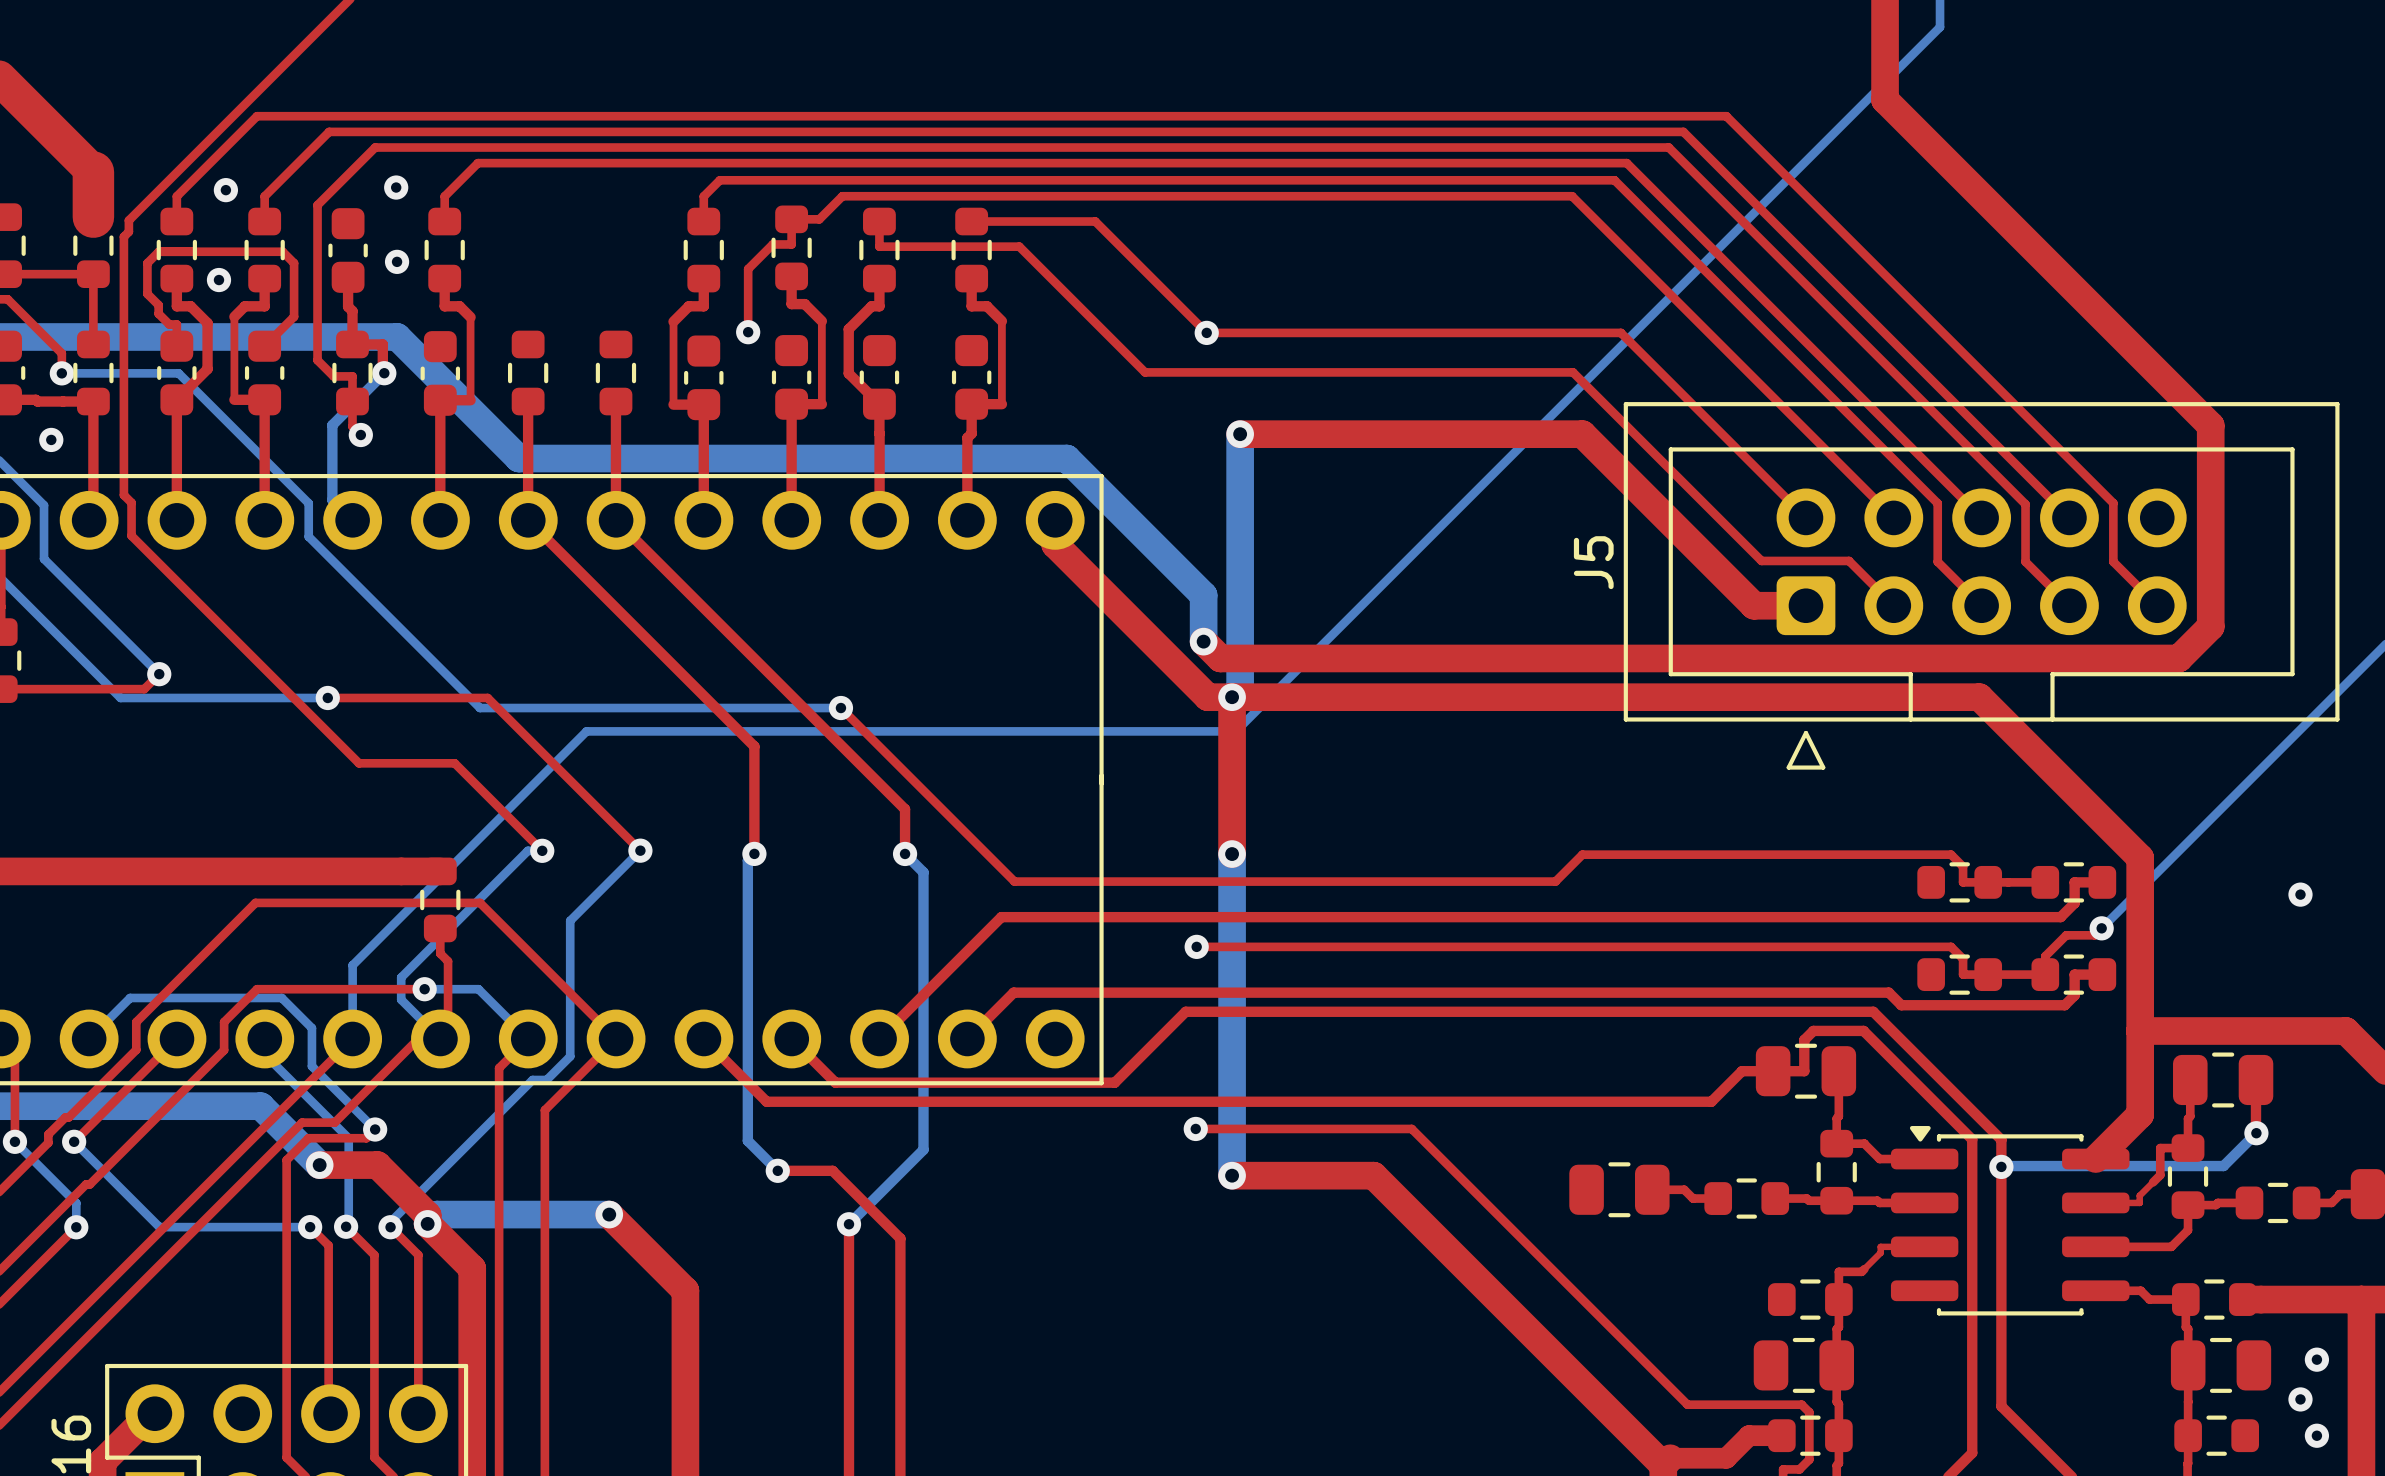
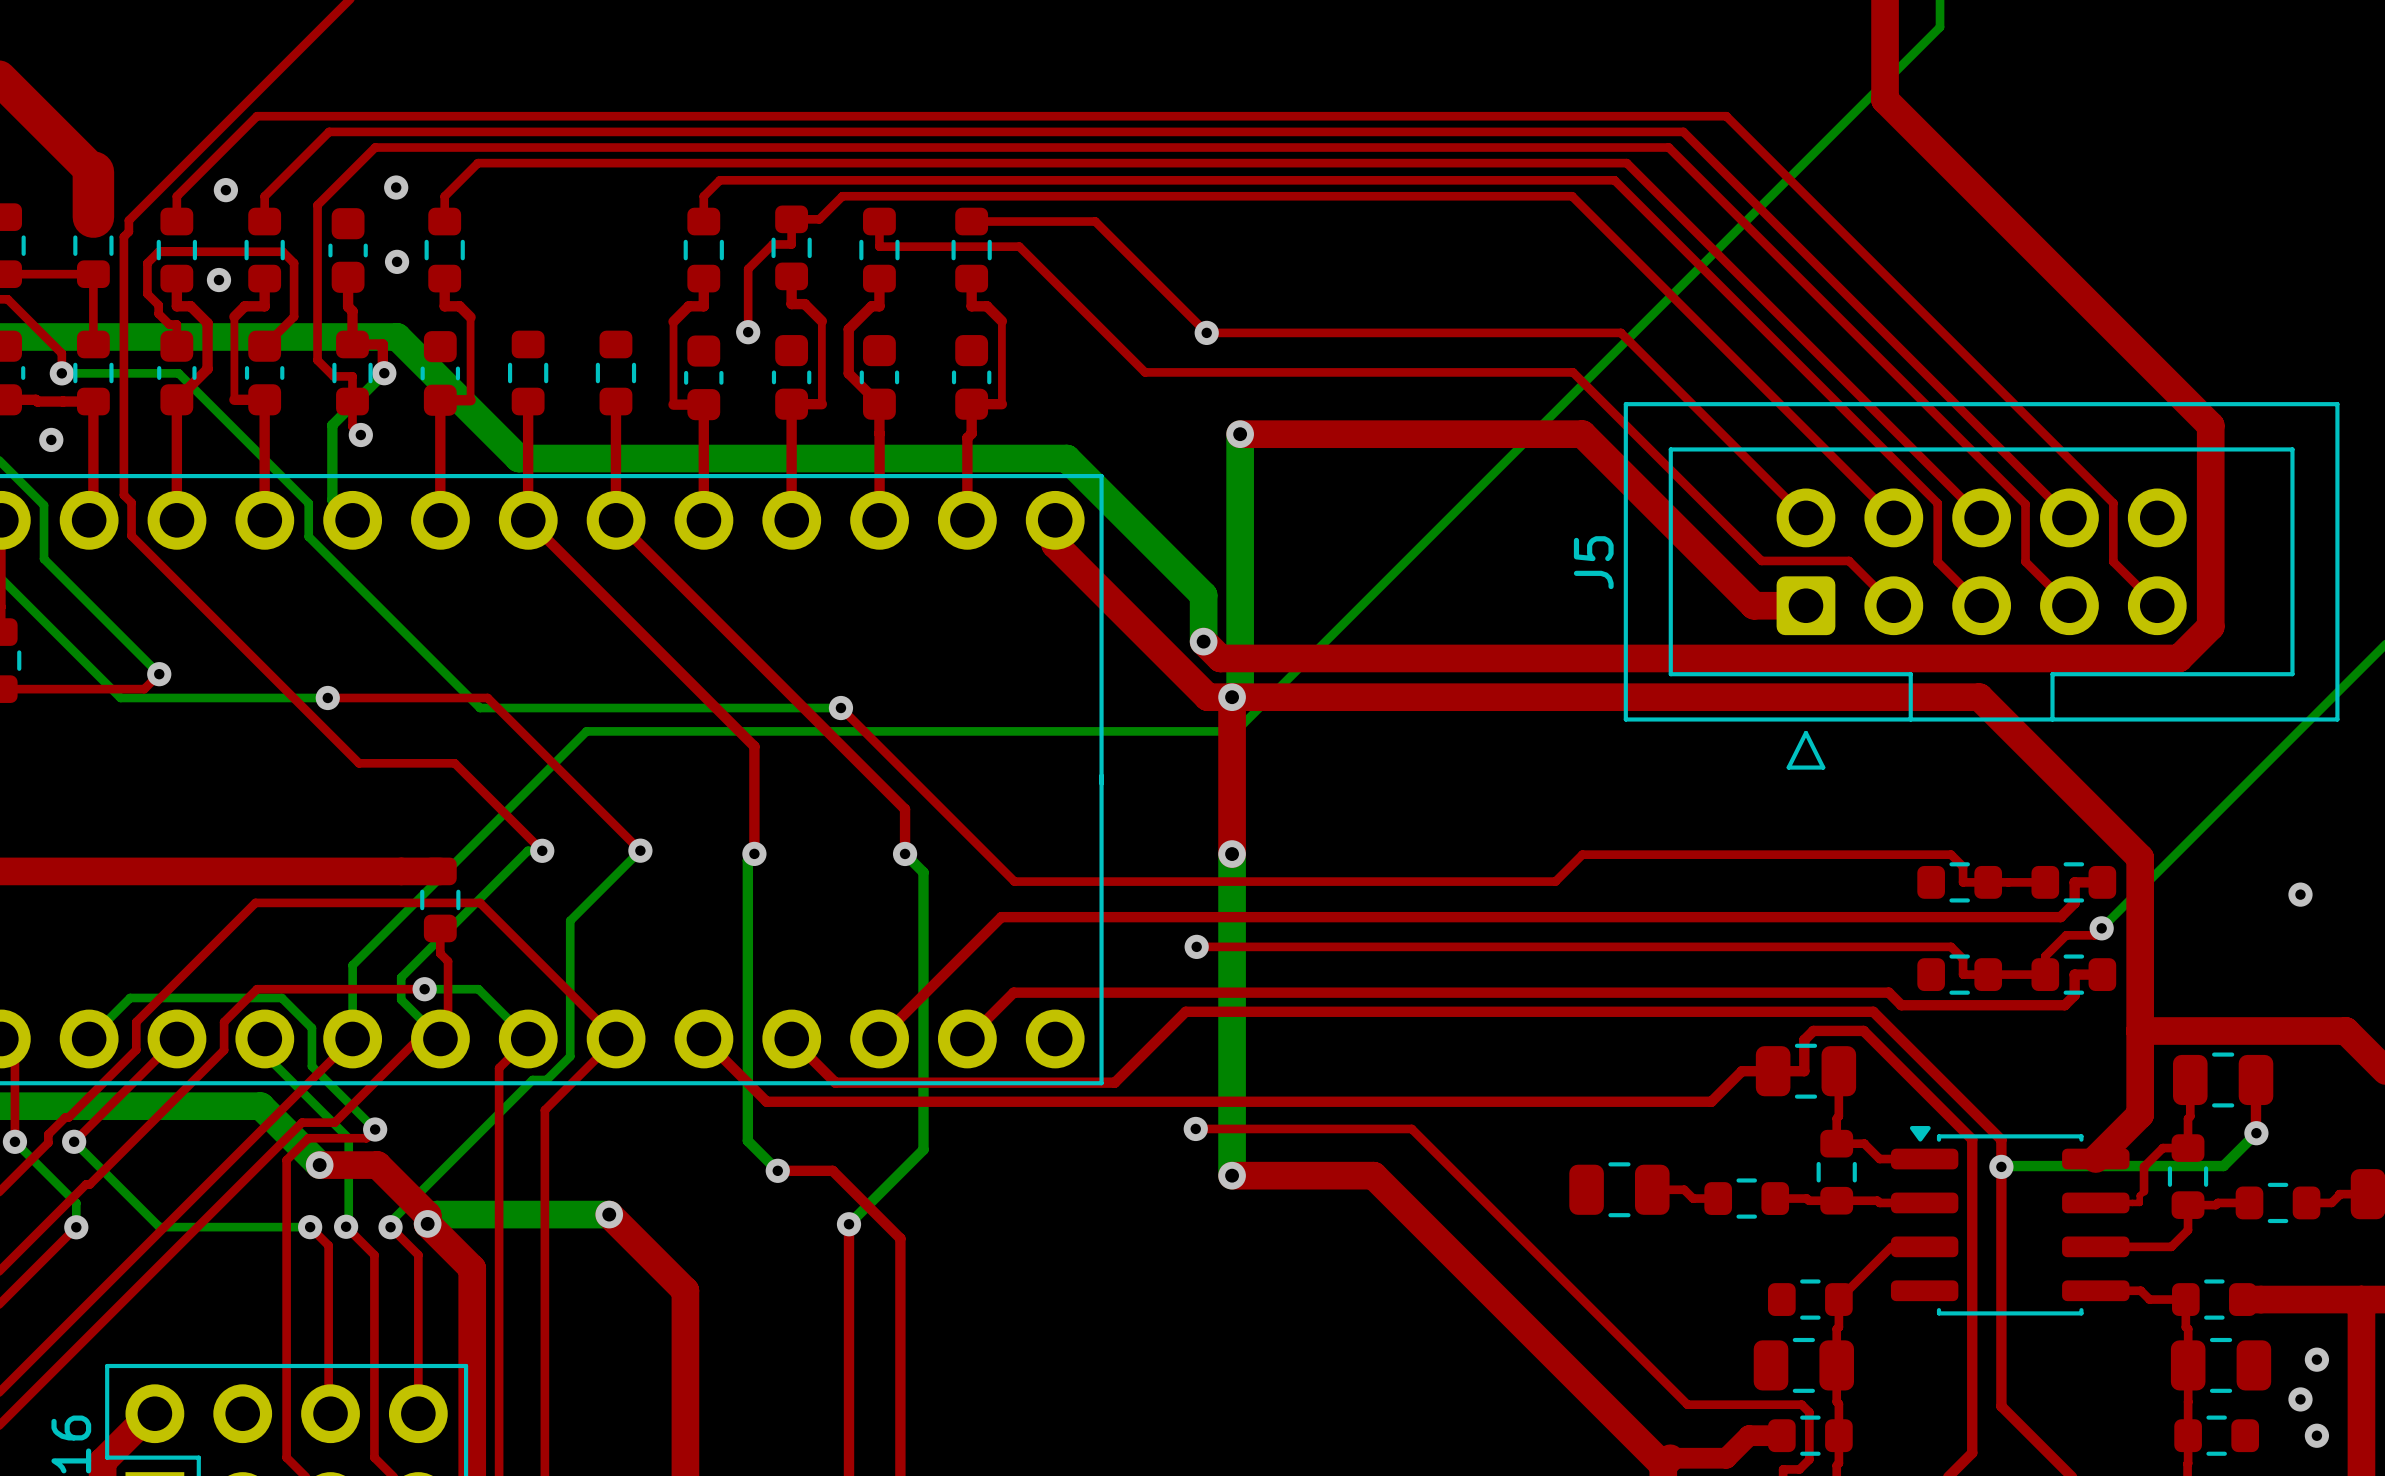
top track: (2162, 1148) (2160, 1148) (2160, 1175) (2144, 1191) -> (2162, 1148) (2144, 1166) (2144, 1191)
top track: (1891, 1246) (1880, 1246) (1880, 1252) (1861, 1271) (1838, 1271) (1838, 1299) -> (1891, 1246) (1838, 1299)

